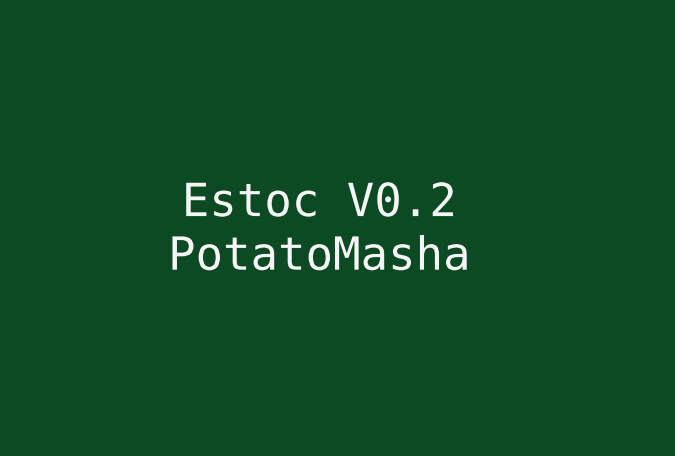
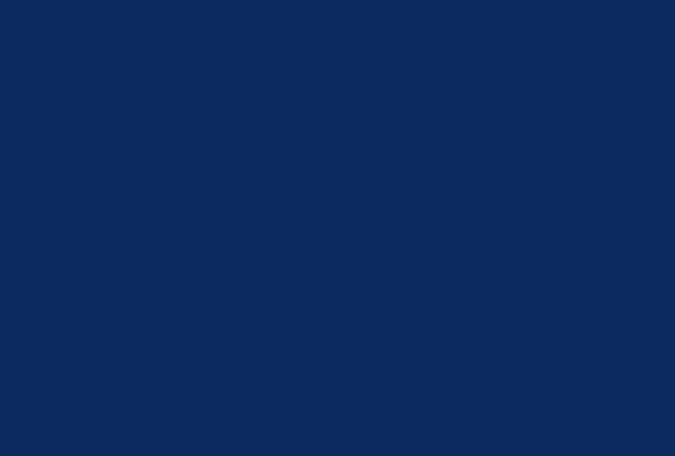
text: Estoc V0.2 (319, 199) -> none
text: PotatoMasha (319, 252) -> none

